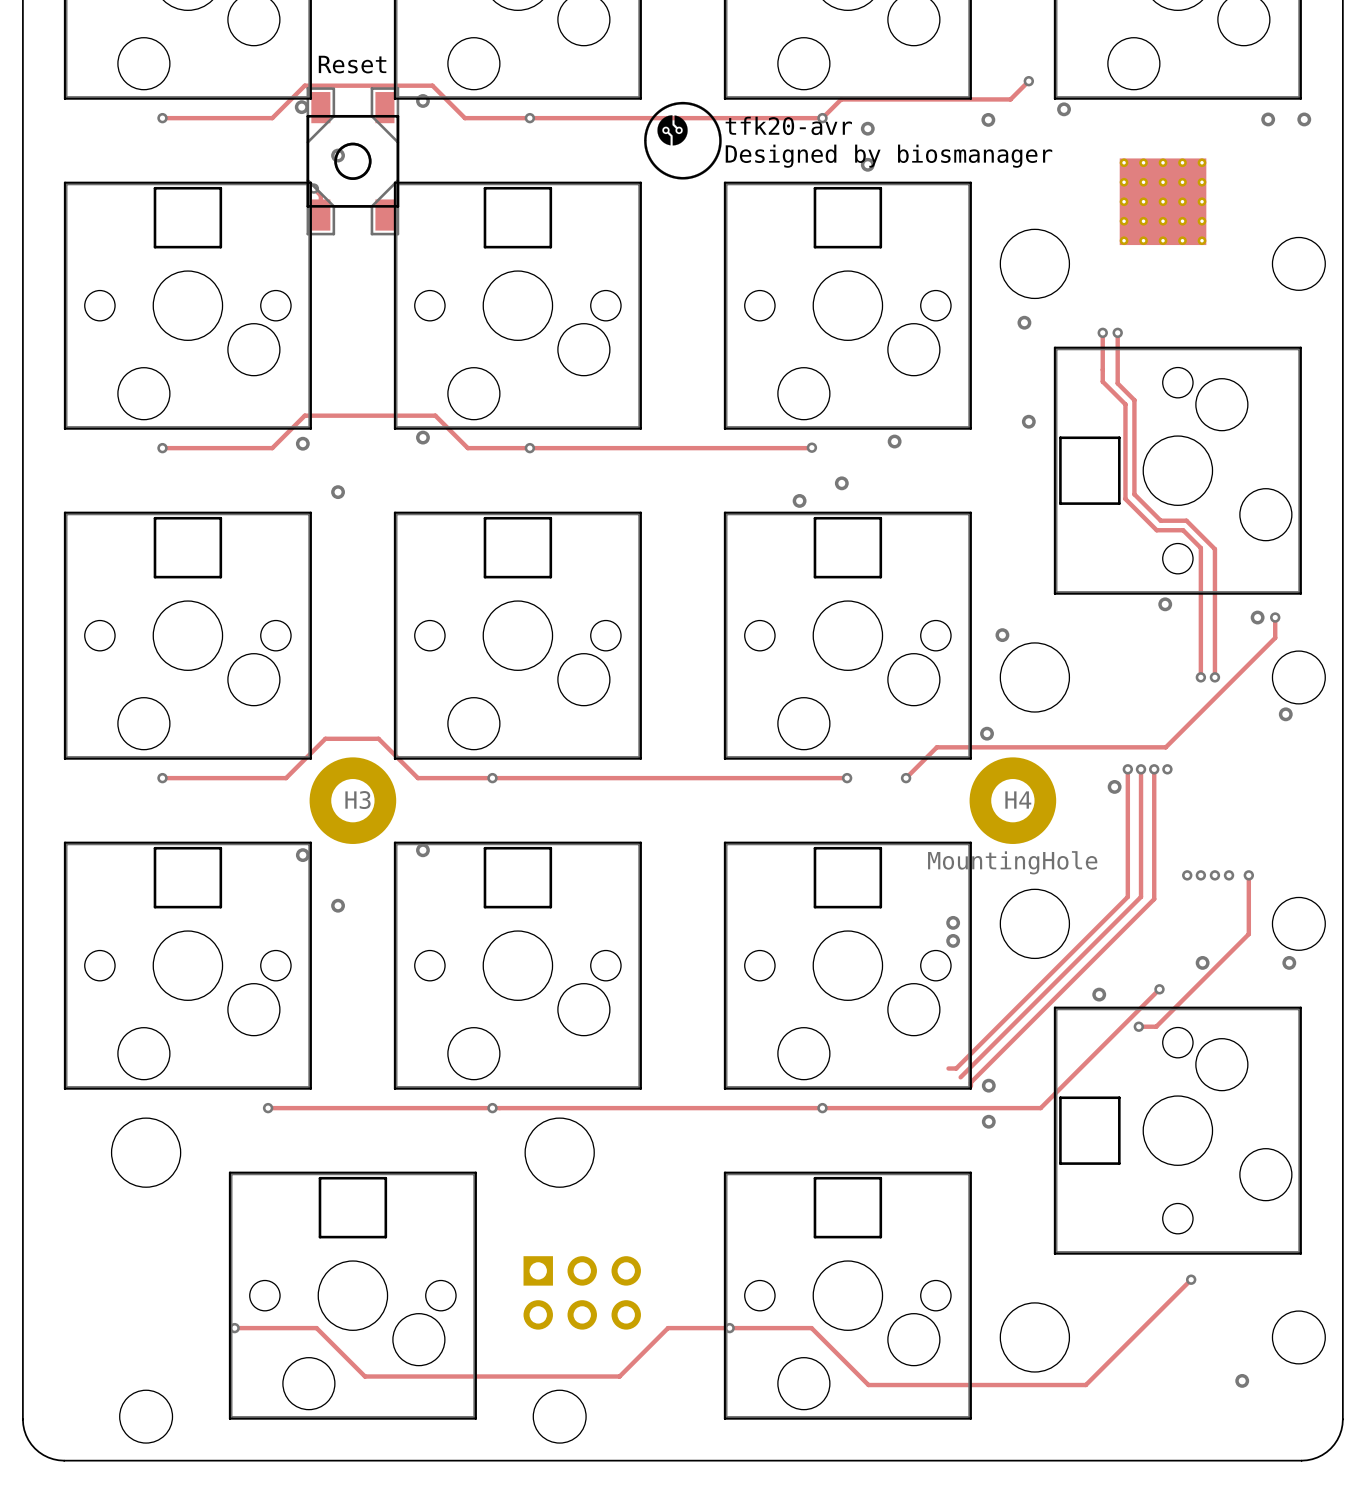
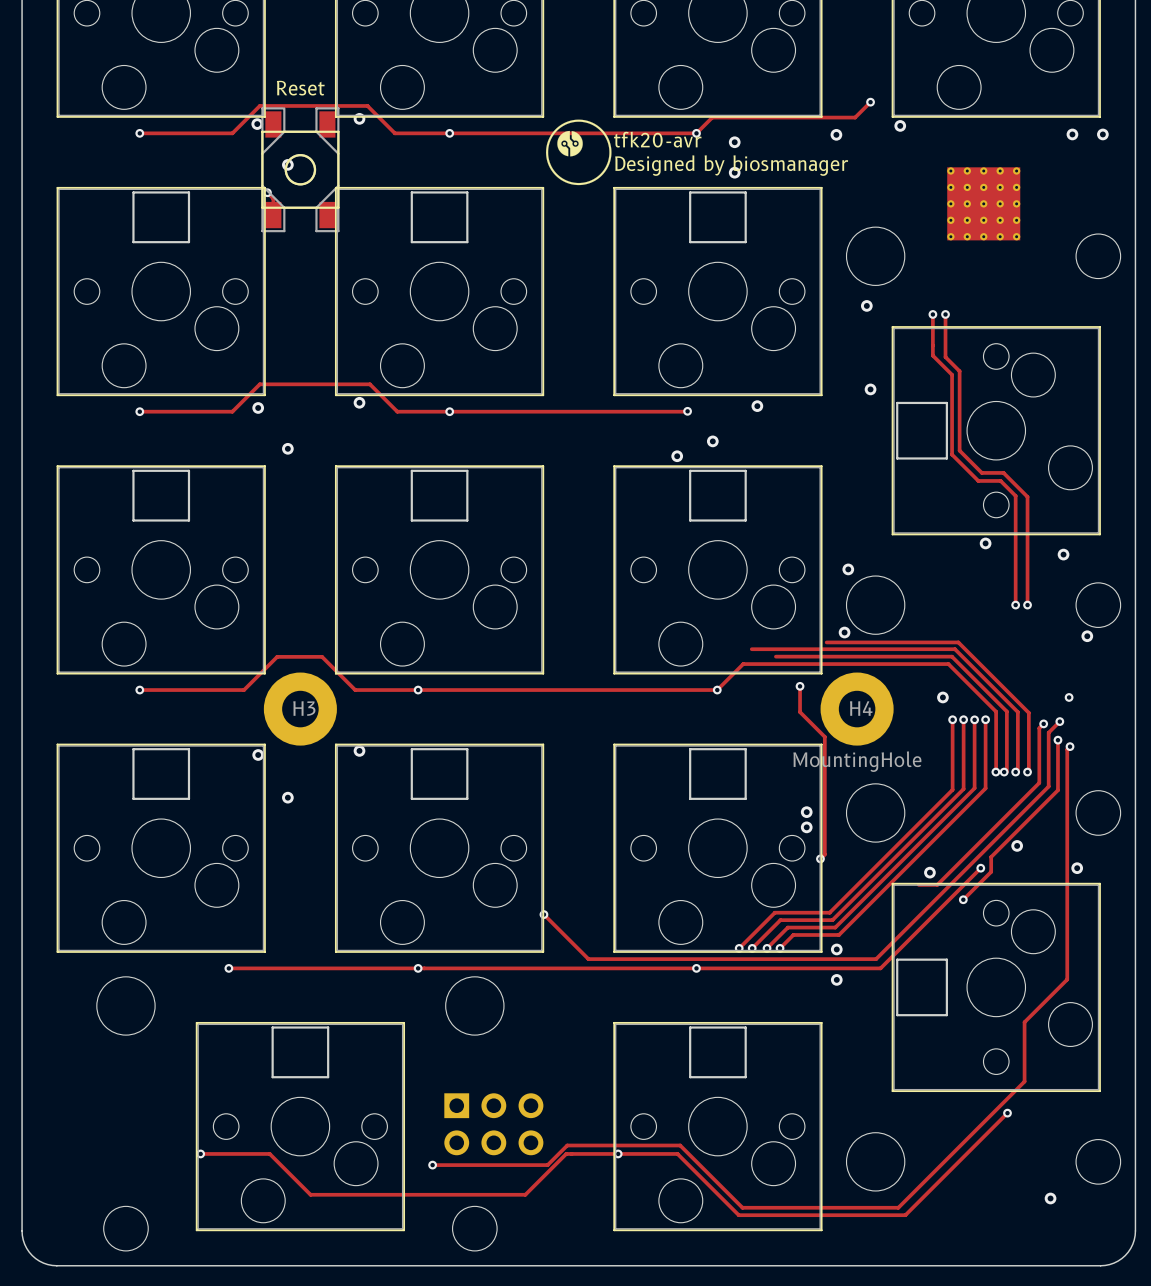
track: (1275, 617) (1275, 637) (1165, 747) (1121, 747) -> (995, 772) (996, 711) (948, 664)
via: (1275, 617) -> none
track: none -> (826, 642) (958, 642) (1028, 712) (1028, 772)
track: none -> (751, 649) (954, 649) (1017, 712) (1017, 772)
via position: (987, 733) -> (844, 632)
track: none -> (775, 656) (951, 656) (1006, 711) (1006, 772)
track: (936, 747) (906, 778) -> (792, 664) (743, 664) (717, 690)
track: (1127, 769) (1127, 896) (956, 1068) -> (985, 719) (985, 788) (839, 934) (809, 934)
via: (1127, 769) -> none
track: (1141, 769) (1141, 896) (960, 1077) -> none
via: (1141, 769) -> none
track: (1154, 769) (1154, 899) (970, 1082) (970, 1086) -> none
via: (1154, 769) -> none
via: (1167, 769) -> none
track: none -> (800, 686) (800, 712) (824, 736) (824, 854) (820, 858)
via position: (906, 778) -> (800, 686)
via: none -> (1069, 697)
track: none -> (952, 719) (952, 789) (829, 912) (774, 912) (739, 948)
via: none -> (952, 719)
track: none -> (963, 719) (963, 789) (832, 920) (780, 920) (752, 948)
via: none -> (963, 719)
track: none -> (974, 719) (974, 788) (835, 927) (787, 927) (767, 948)
via: none -> (974, 719)
via: none -> (985, 719)
track: none -> (1059, 721) (1048, 732) (1048, 786) (876, 959) (588, 959) (543, 914)
via: none -> (1059, 721)
track: none -> (1043, 723) (1039, 728) (1039, 782) (937, 884) (918, 884)
via: none -> (1043, 723)
track: none -> (1057, 740) (1057, 790) (991, 857) (991, 871) (961, 901)
via: none -> (1057, 740)
track: none -> (1070, 746) (1067, 749) (1067, 979) (1024, 1022) (1024, 1081) (898, 1207) (742, 1207) (680, 1145) (567, 1145) (547, 1165) (432, 1165)
via: none -> (1070, 746)
via: none -> (995, 772)
via: (1229, 875) -> none
track: (1248, 875) (1248, 934) (1156, 1026) (1138, 1026) -> none
via: (1248, 875) -> none
via position: (1289, 962) -> (1077, 868)
via: none -> (820, 858)
via: none -> (543, 914)
track: none -> (802, 934) (793, 934) (780, 948)
via: none -> (739, 948)
via: none -> (752, 948)
via: none -> (767, 948)
via: none -> (780, 948)
track: (800, 1328) (811, 1328) (868, 1385) (1085, 1385) -> (677, 1153) (738, 1215) (905, 1215) (918, 1201)
via: none -> (432, 1165)

